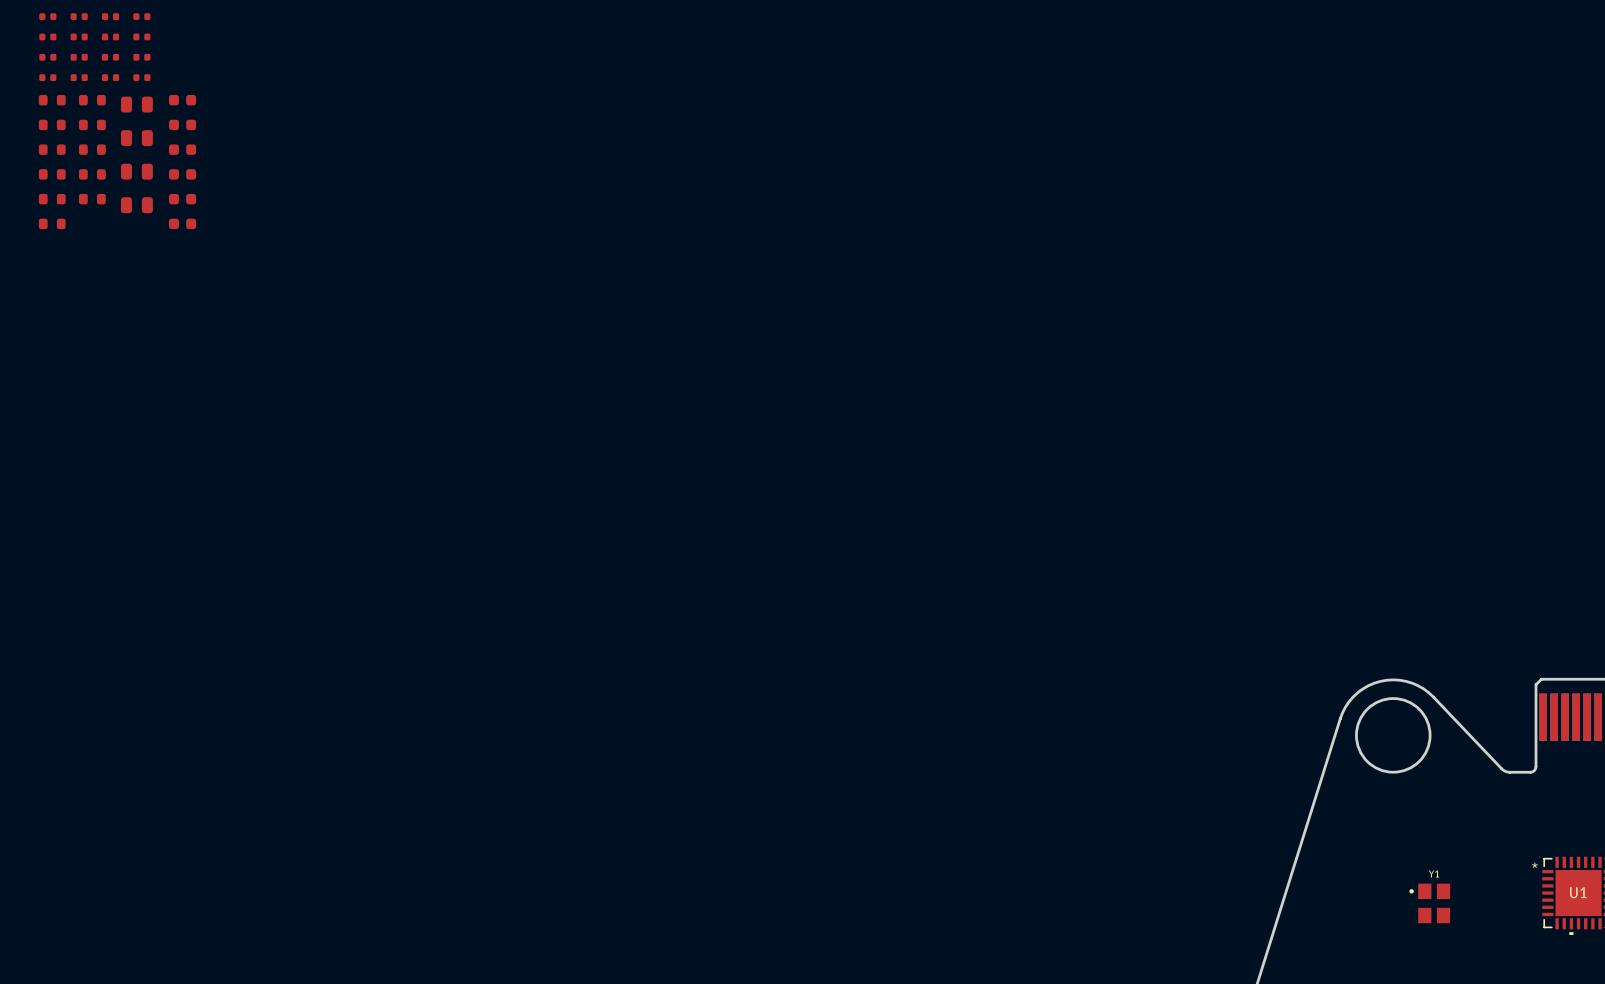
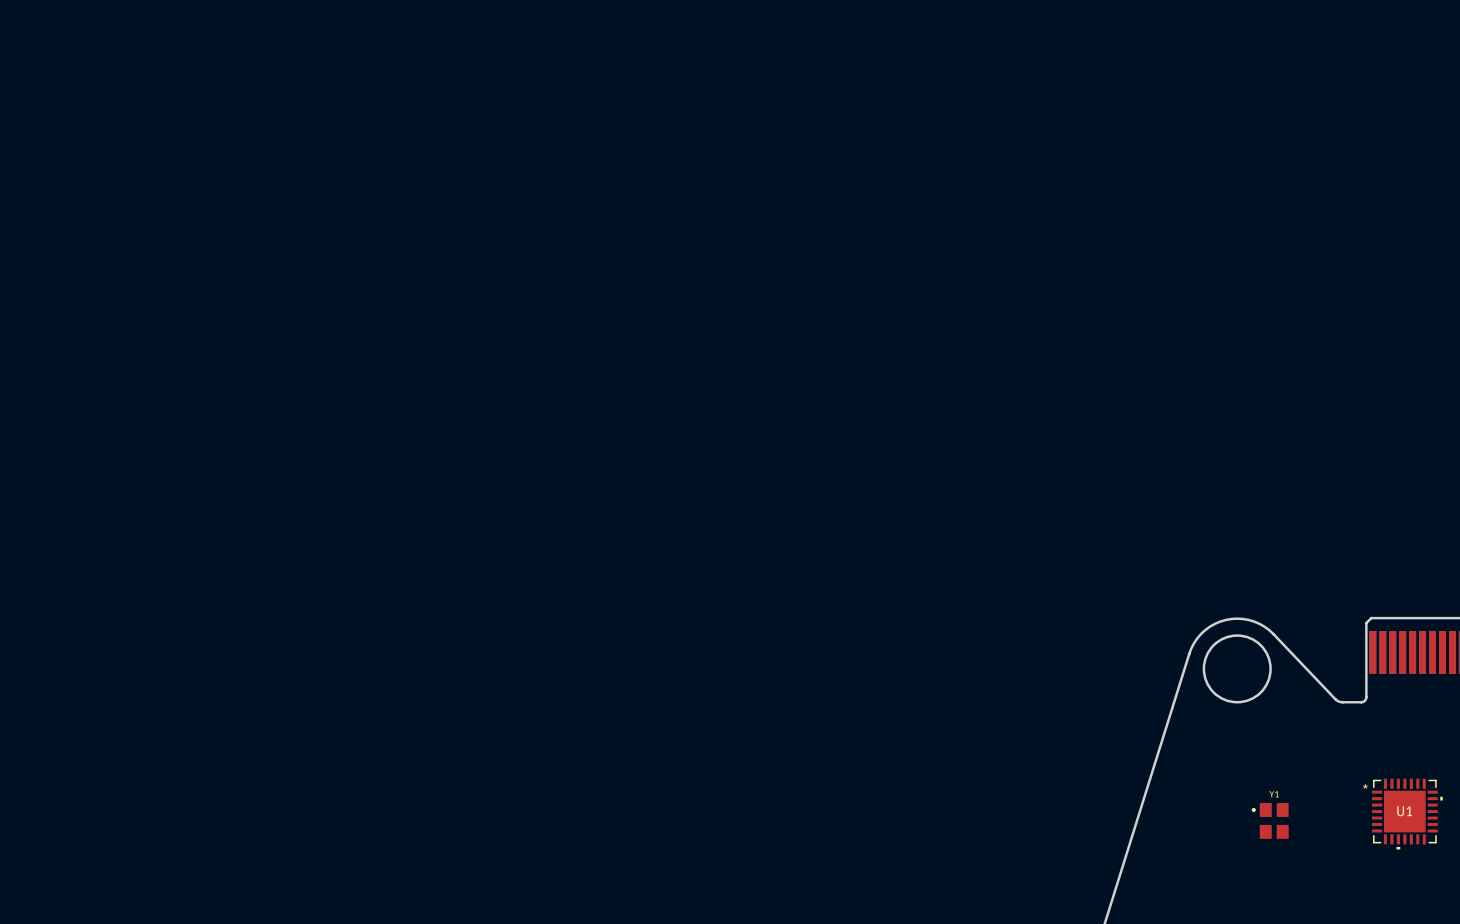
part: (47, 16) -> none
part: (79, 16) -> none
part: (110, 16) -> none
part: (141, 16) -> none
part: (47, 36) -> none
part: (79, 36) -> none
part: (110, 36) -> none
part: (141, 36) -> none
part: (47, 57) -> none
part: (79, 57) -> none
part: (110, 57) -> none
part: (141, 57) -> none
part: (47, 77) -> none
part: (79, 77) -> none
part: (110, 77) -> none
part: (141, 77) -> none
part: (52, 100) -> none
part: (92, 100) -> none
part: (182, 100) -> none
part: (136, 104) -> none
part: (52, 124) -> none
part: (92, 124) -> none
part: (182, 124) -> none
part: (136, 138) -> none
part: (52, 149) -> none
part: (92, 149) -> none
part: (182, 149) -> none
part: (136, 171) -> none
part: (52, 174) -> none
part: (92, 174) -> none
part: (182, 174) -> none
part: (52, 199) -> none
part: (92, 199) -> none
part: (182, 199) -> none
part: (136, 205) -> none
part: (52, 223) -> none
part: (182, 223) -> none

